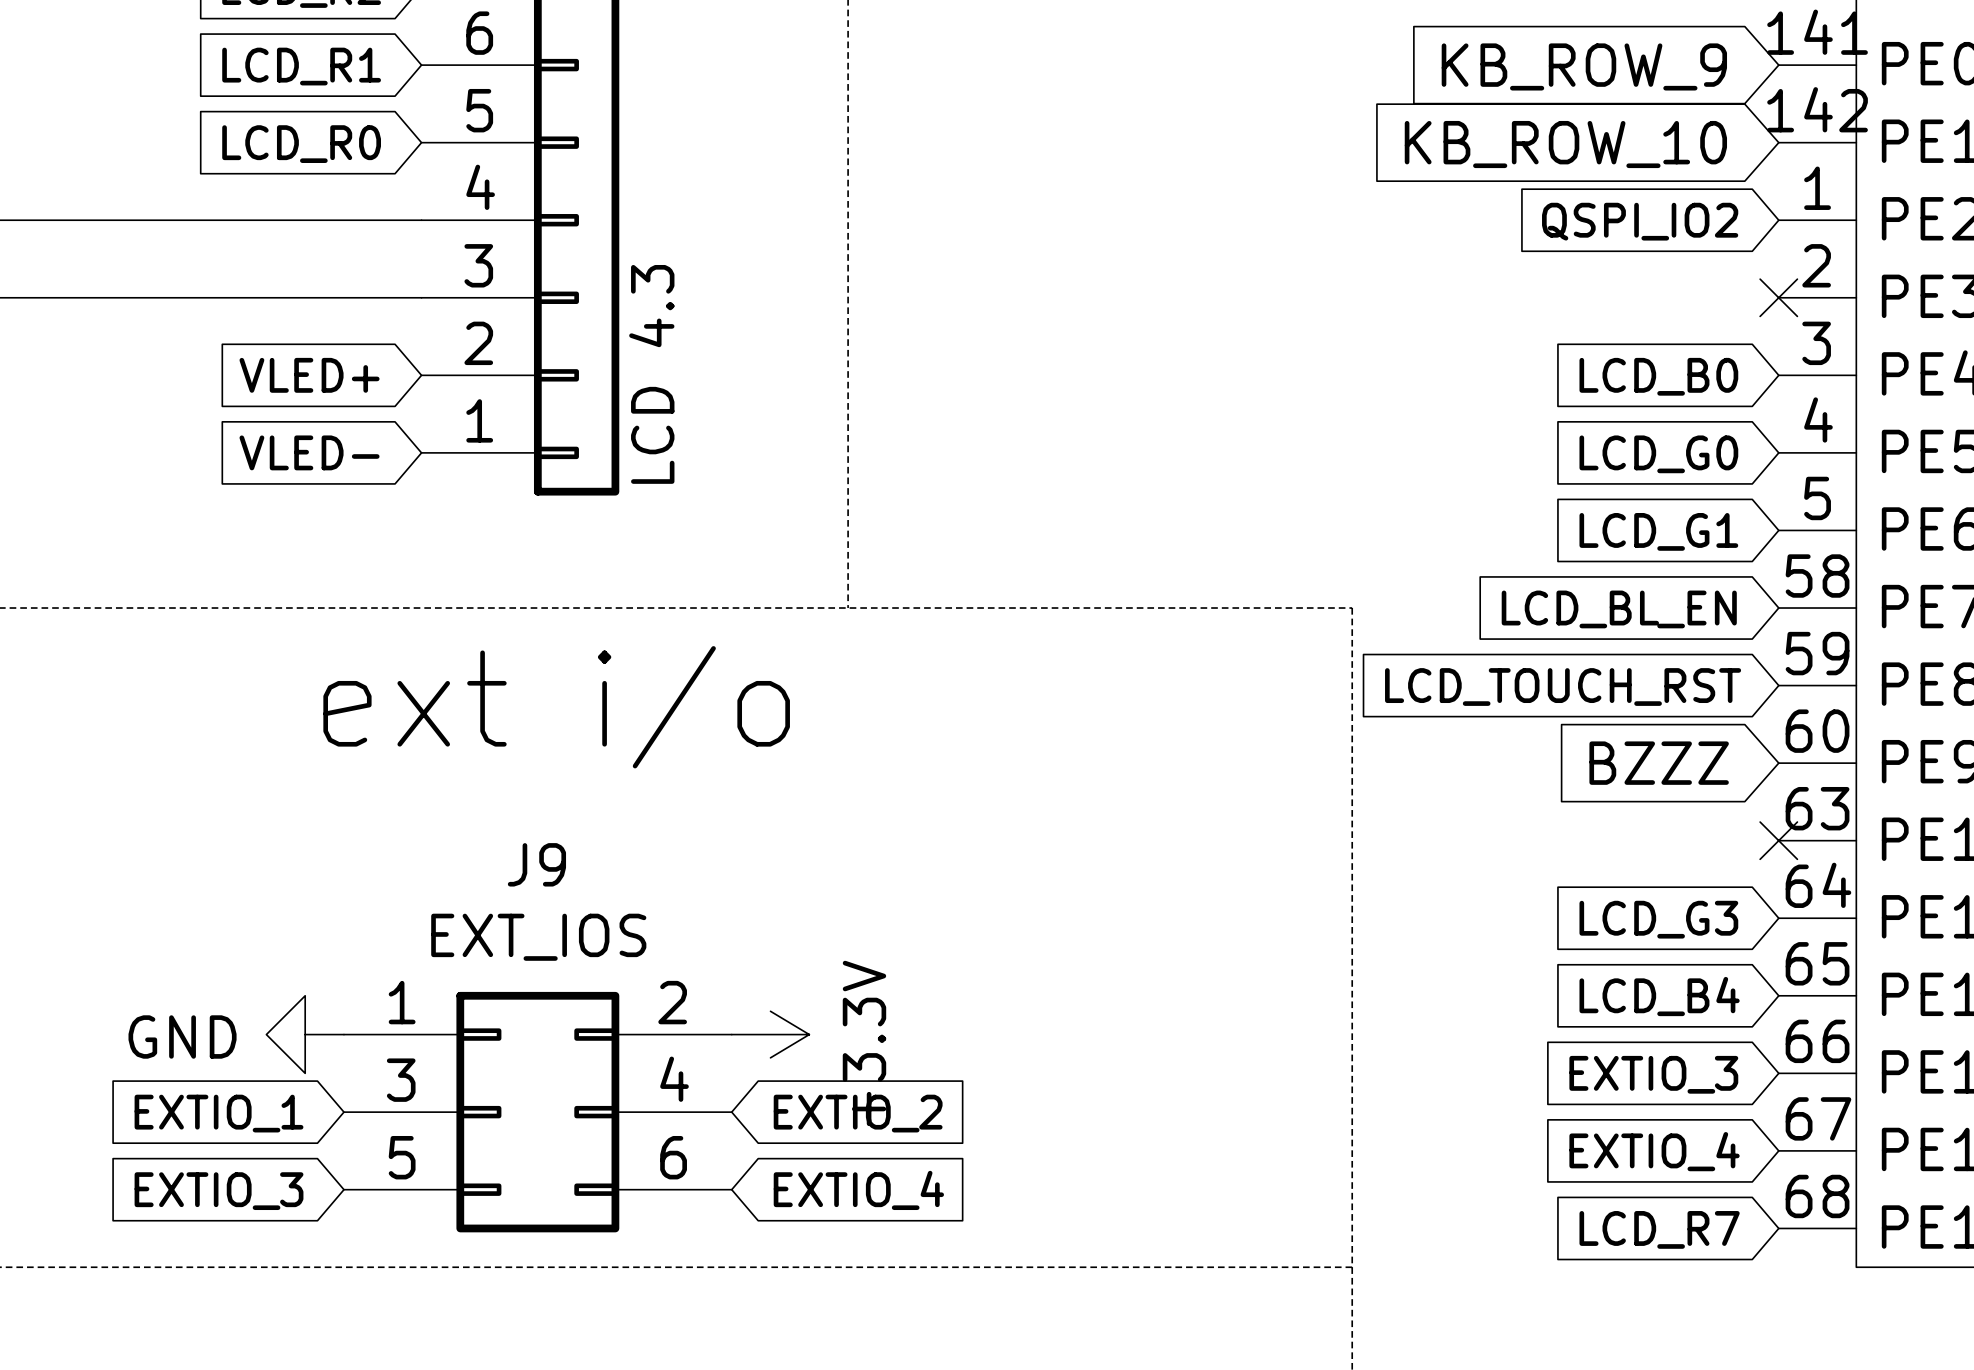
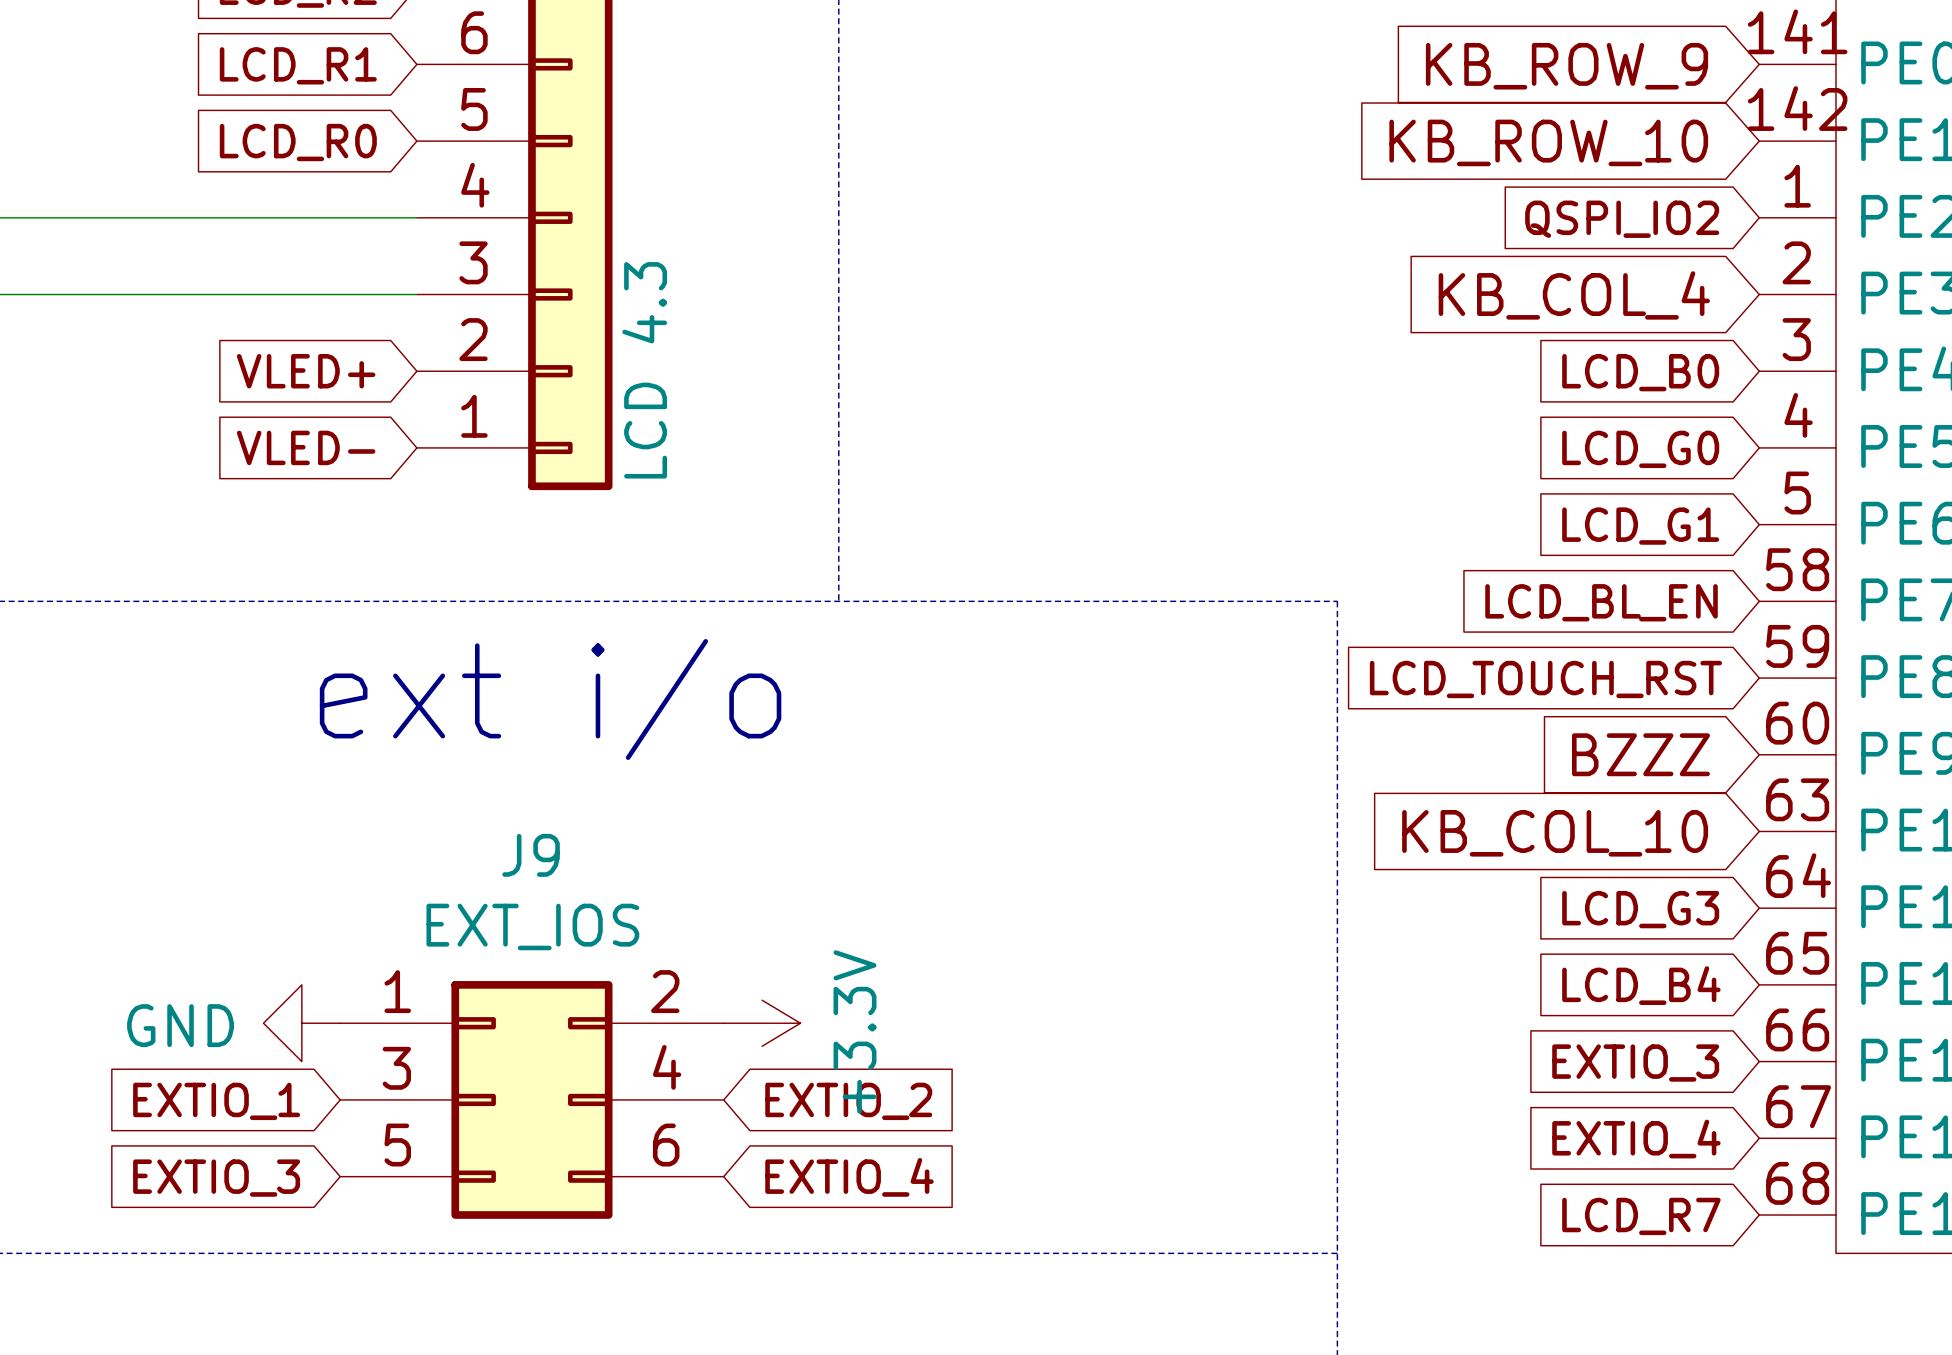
no-connect mark: (1778, 297) -> none
global label: none -> KB_COL_4 (1574, 295)
no-connect mark: (1778, 840) -> none
global label: none -> KB_COL_10 (1555, 833)

